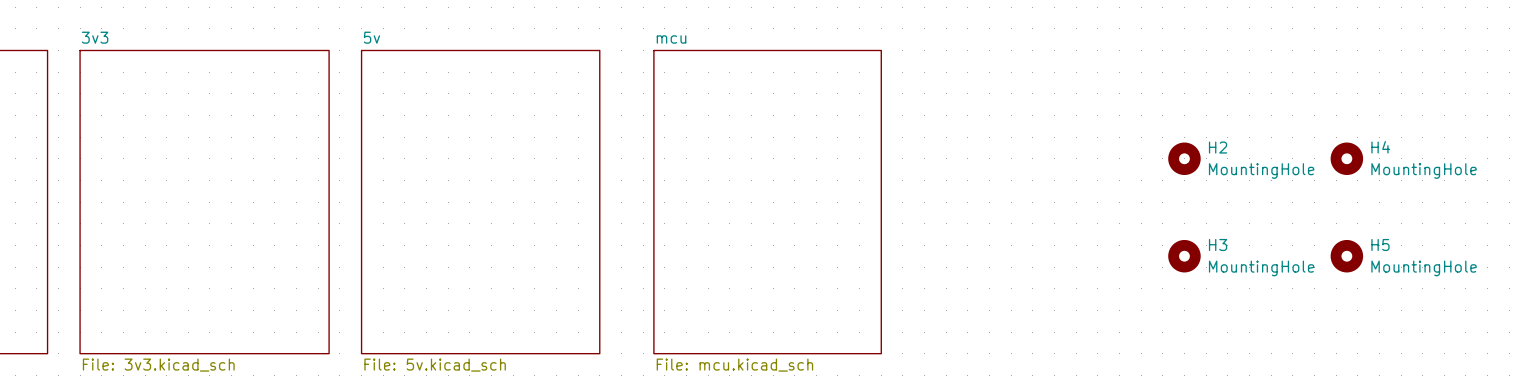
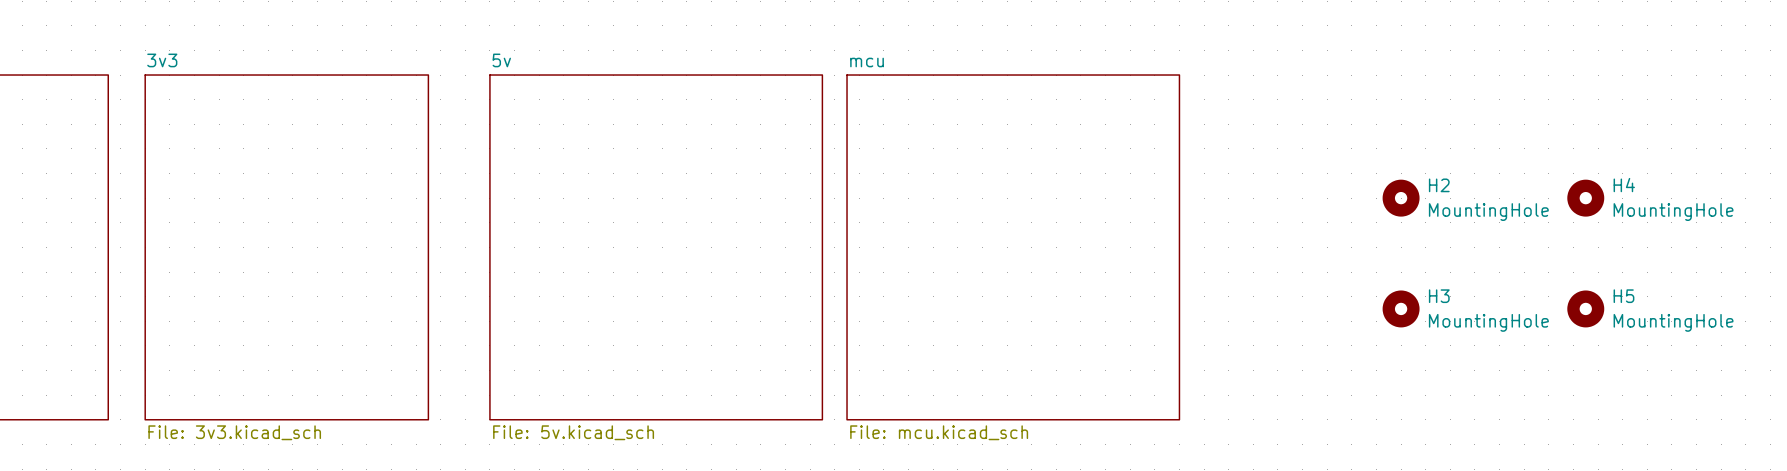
sheet 5v name position: 5v (371, 37) -> 5v (501, 60)
sheet 5v shape: [360, 49, 601, 355] -> [489, 74, 824, 421]
sheet mcu: File: mcu.kicad_sch (767, 202) -> none
sheet mcu: none -> File: mcu.kicad_sch (1013, 247)
sheet 5v value position: File: 5v.kicad_sch (435, 365) -> File: 5v.kicad_sch (573, 432)

